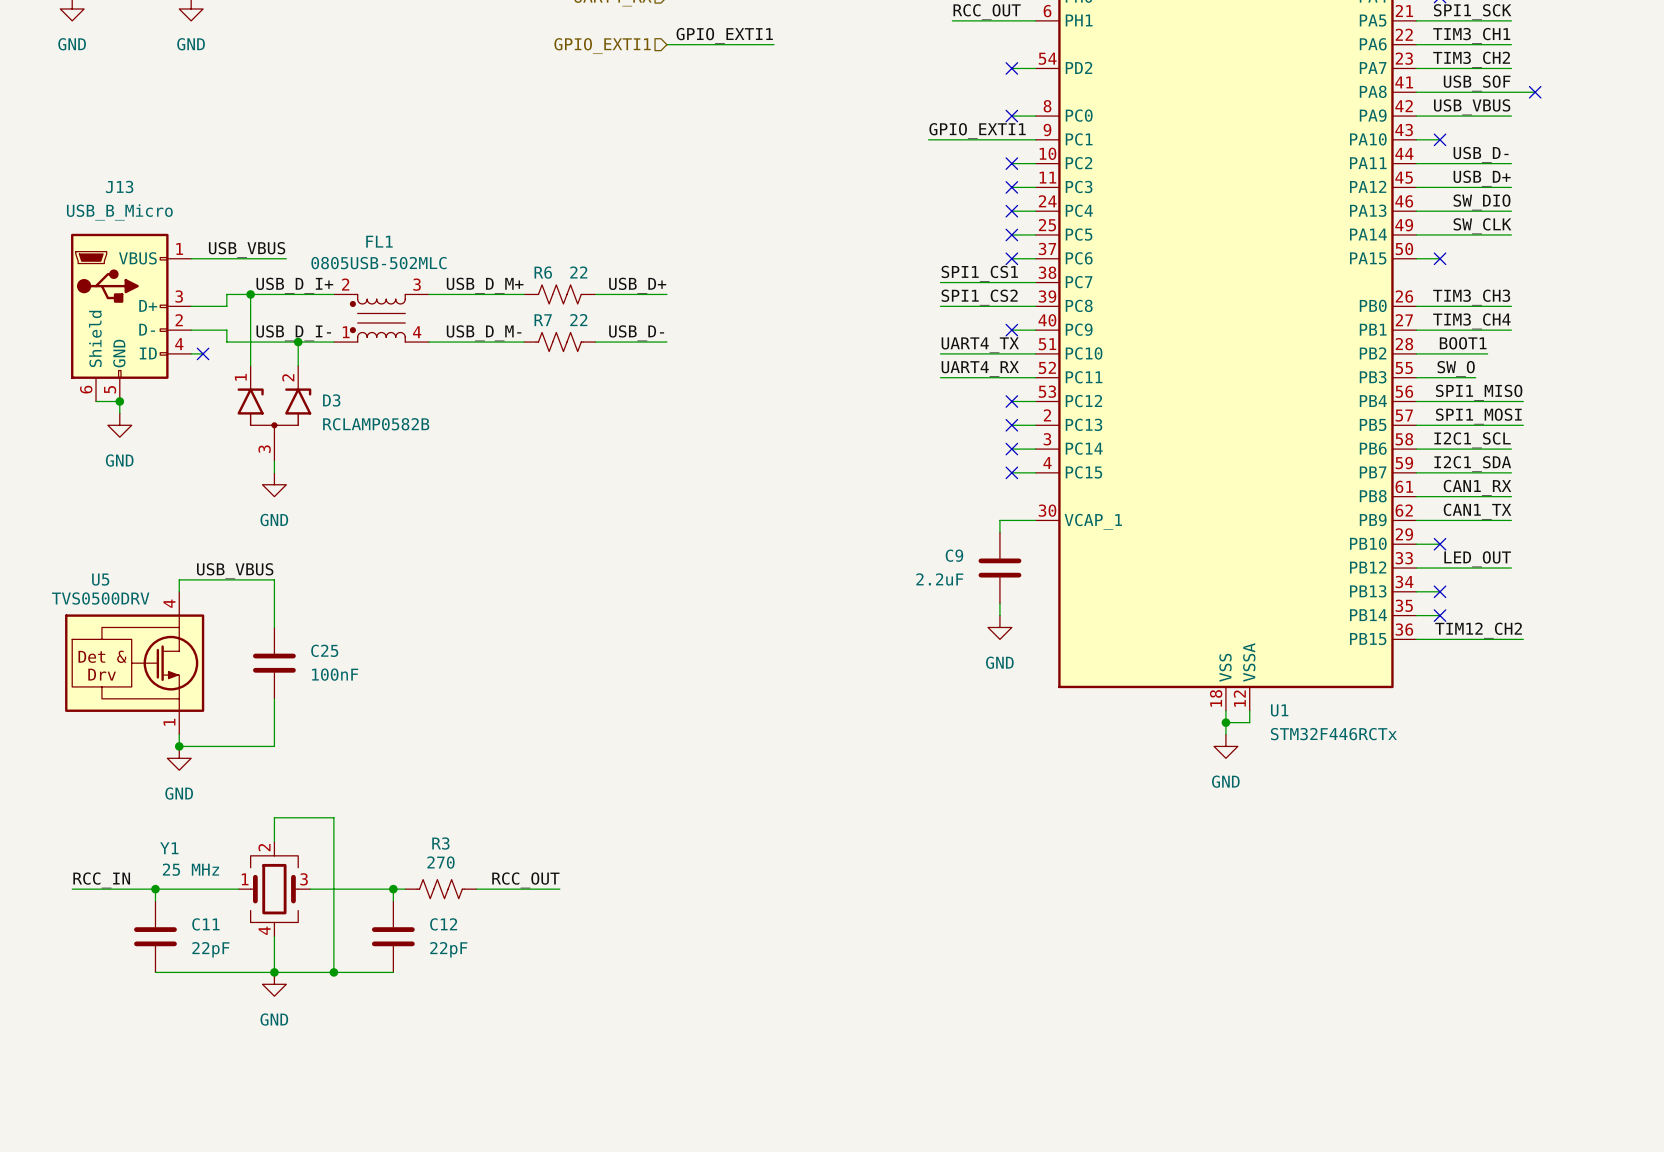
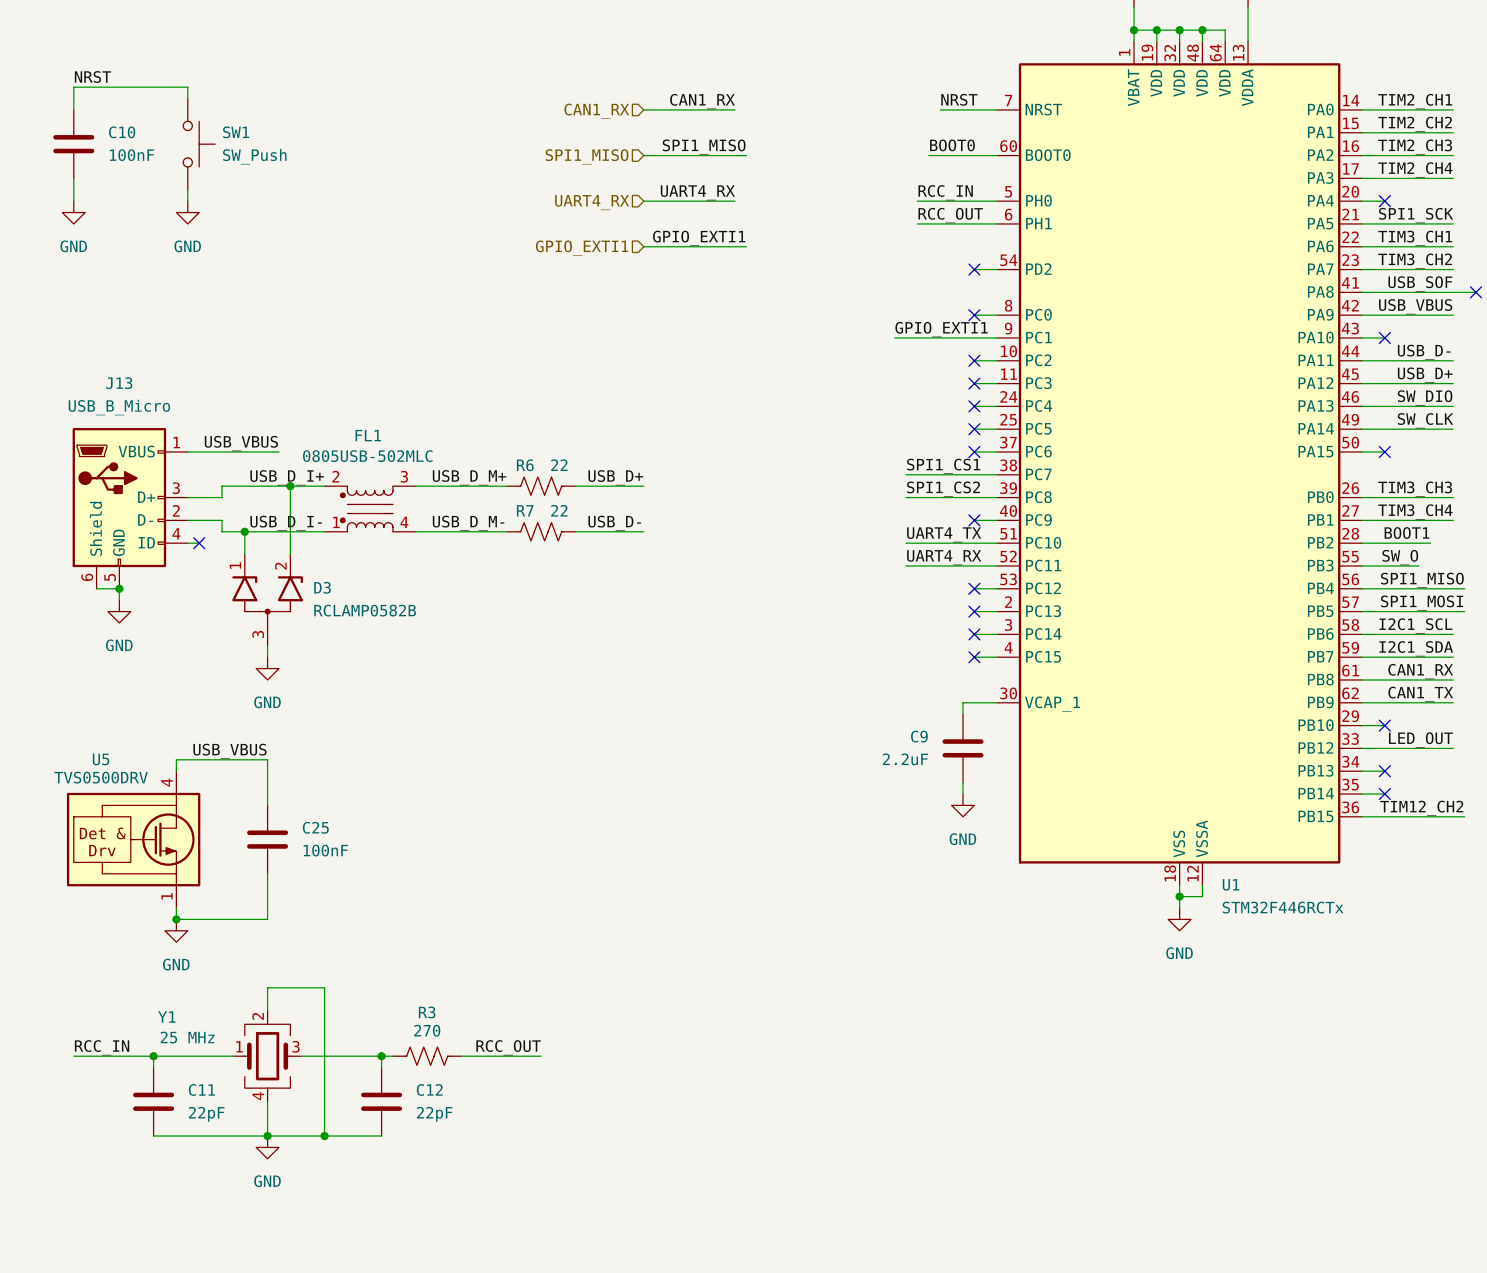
wire: (250, 294) (250, 342) -> (290, 486) (290, 531)
junction: (250, 294) -> none
junction: none -> (290, 486)
junction: none -> (244, 531)
junction: (298, 342) -> none

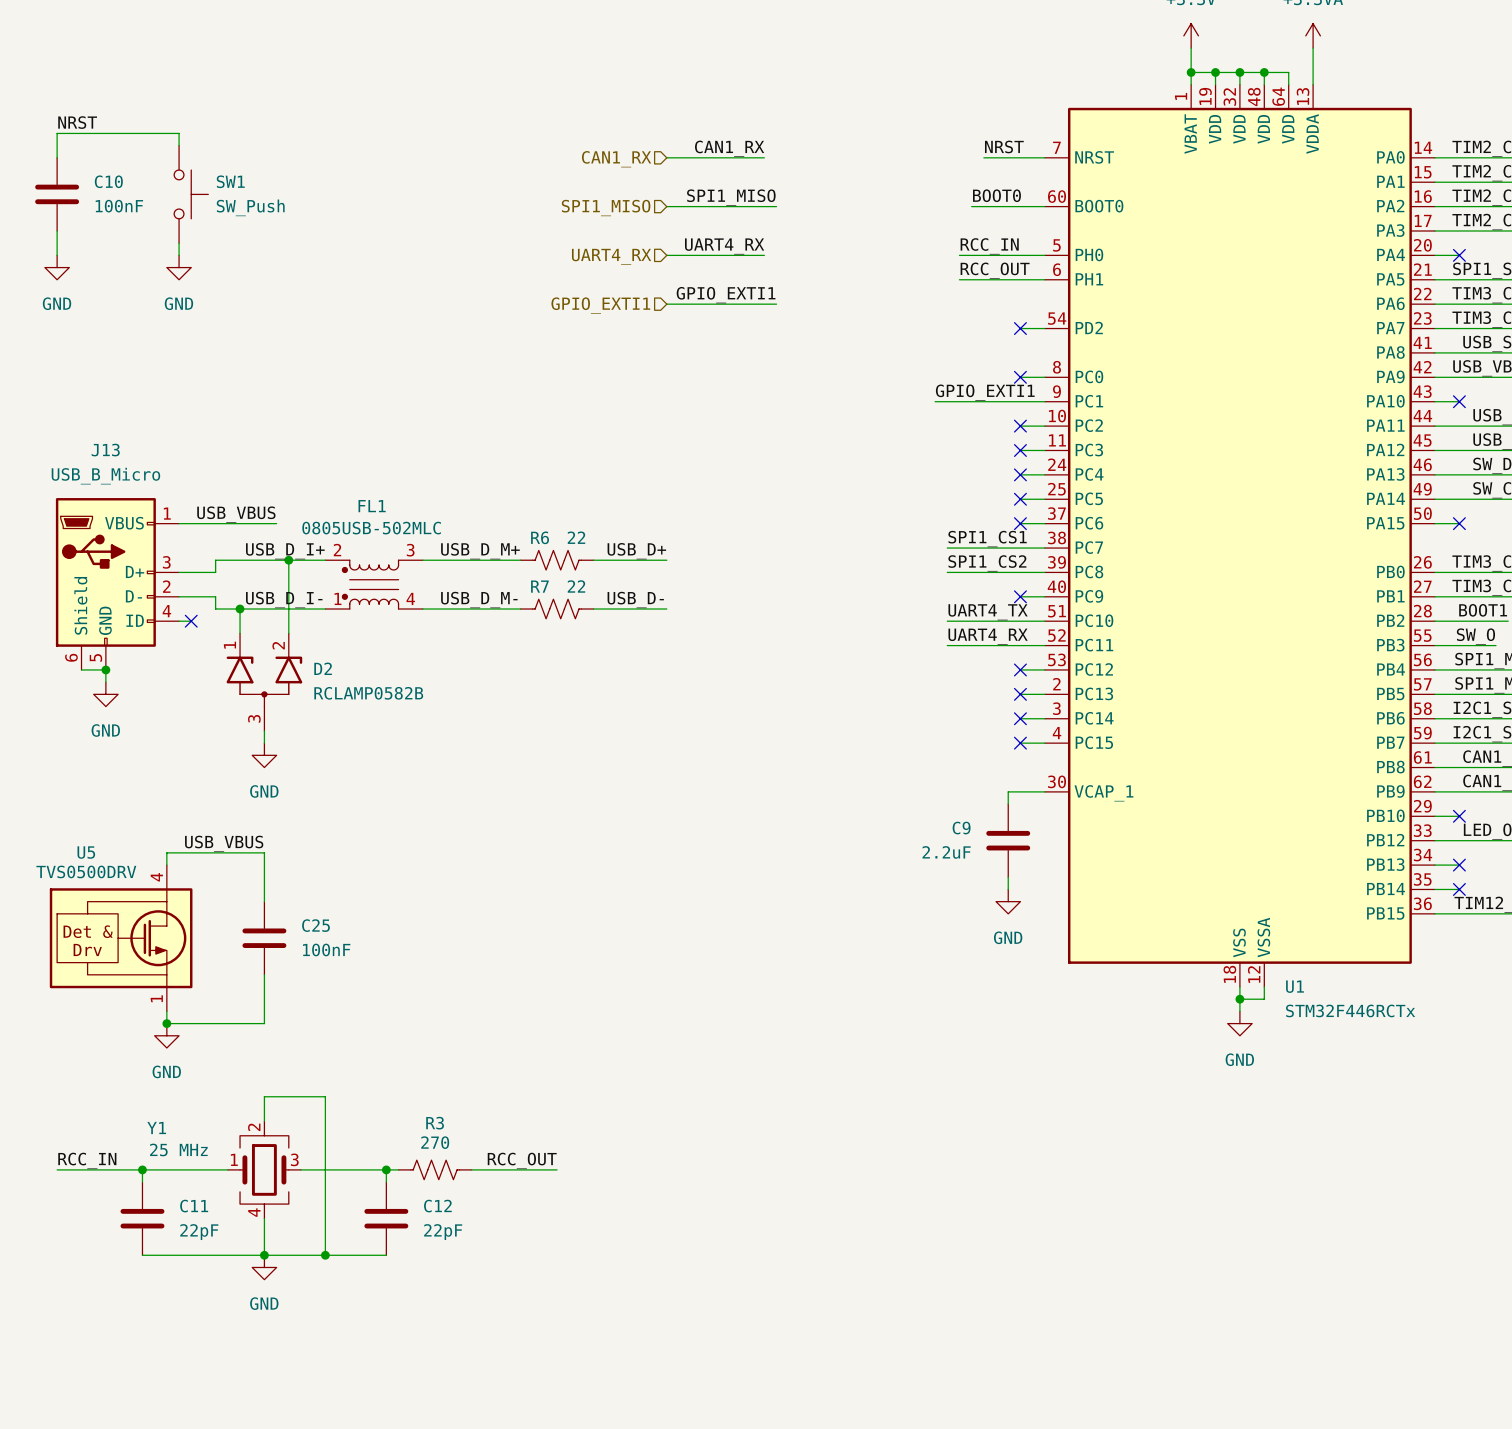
D3 name: D3 (322, 587) -> D2 (323, 668)

